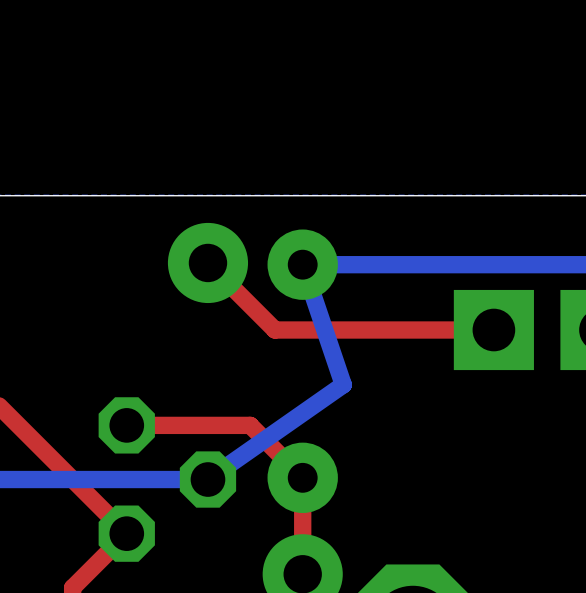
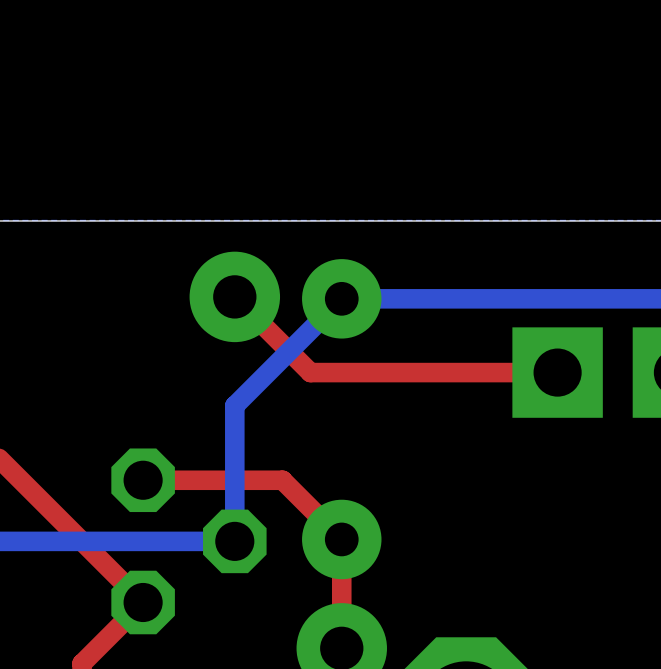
bottom track: (302, 264) (343, 384) (207, 479) -> (341, 298) (234, 405) (234, 541)

